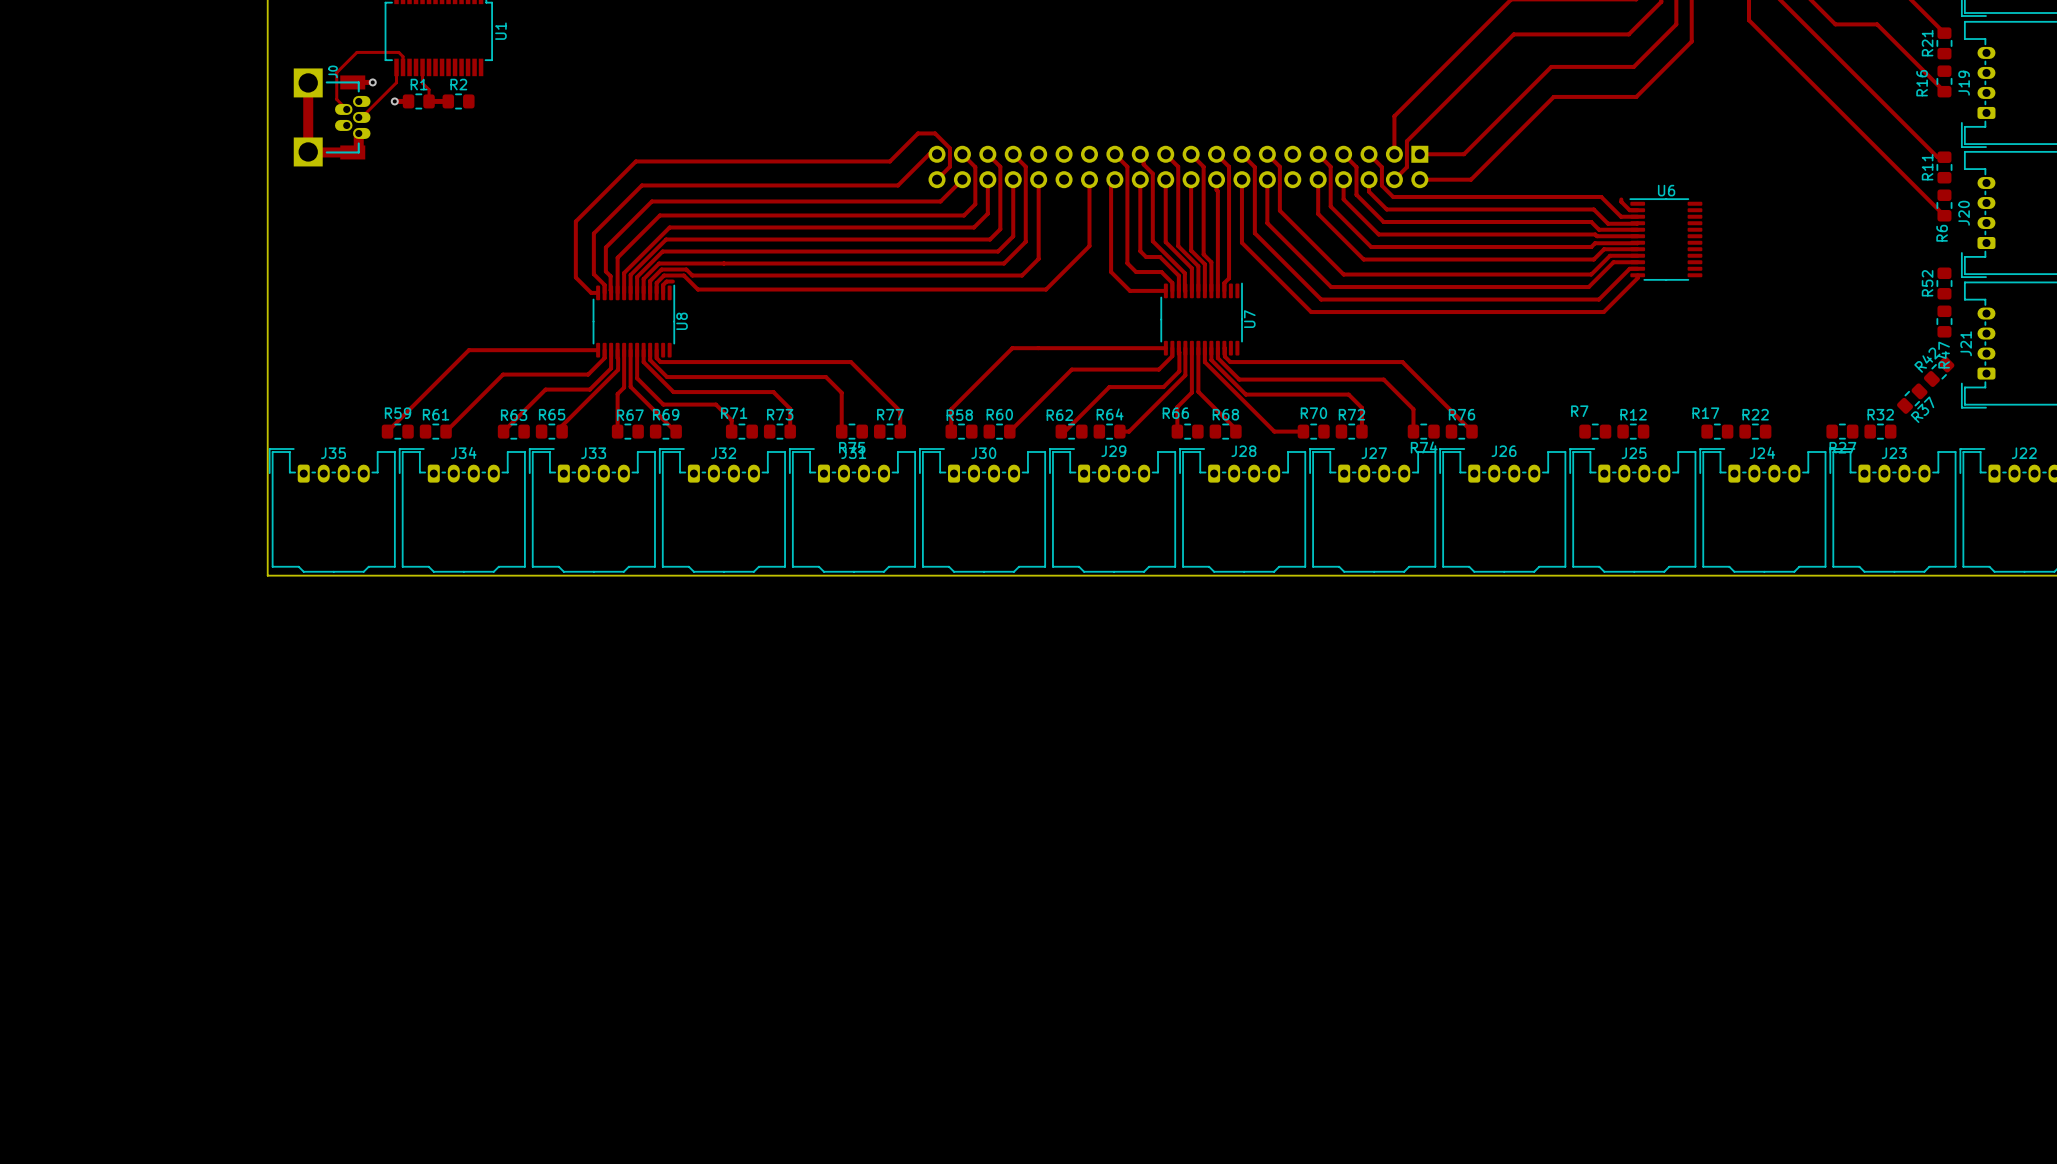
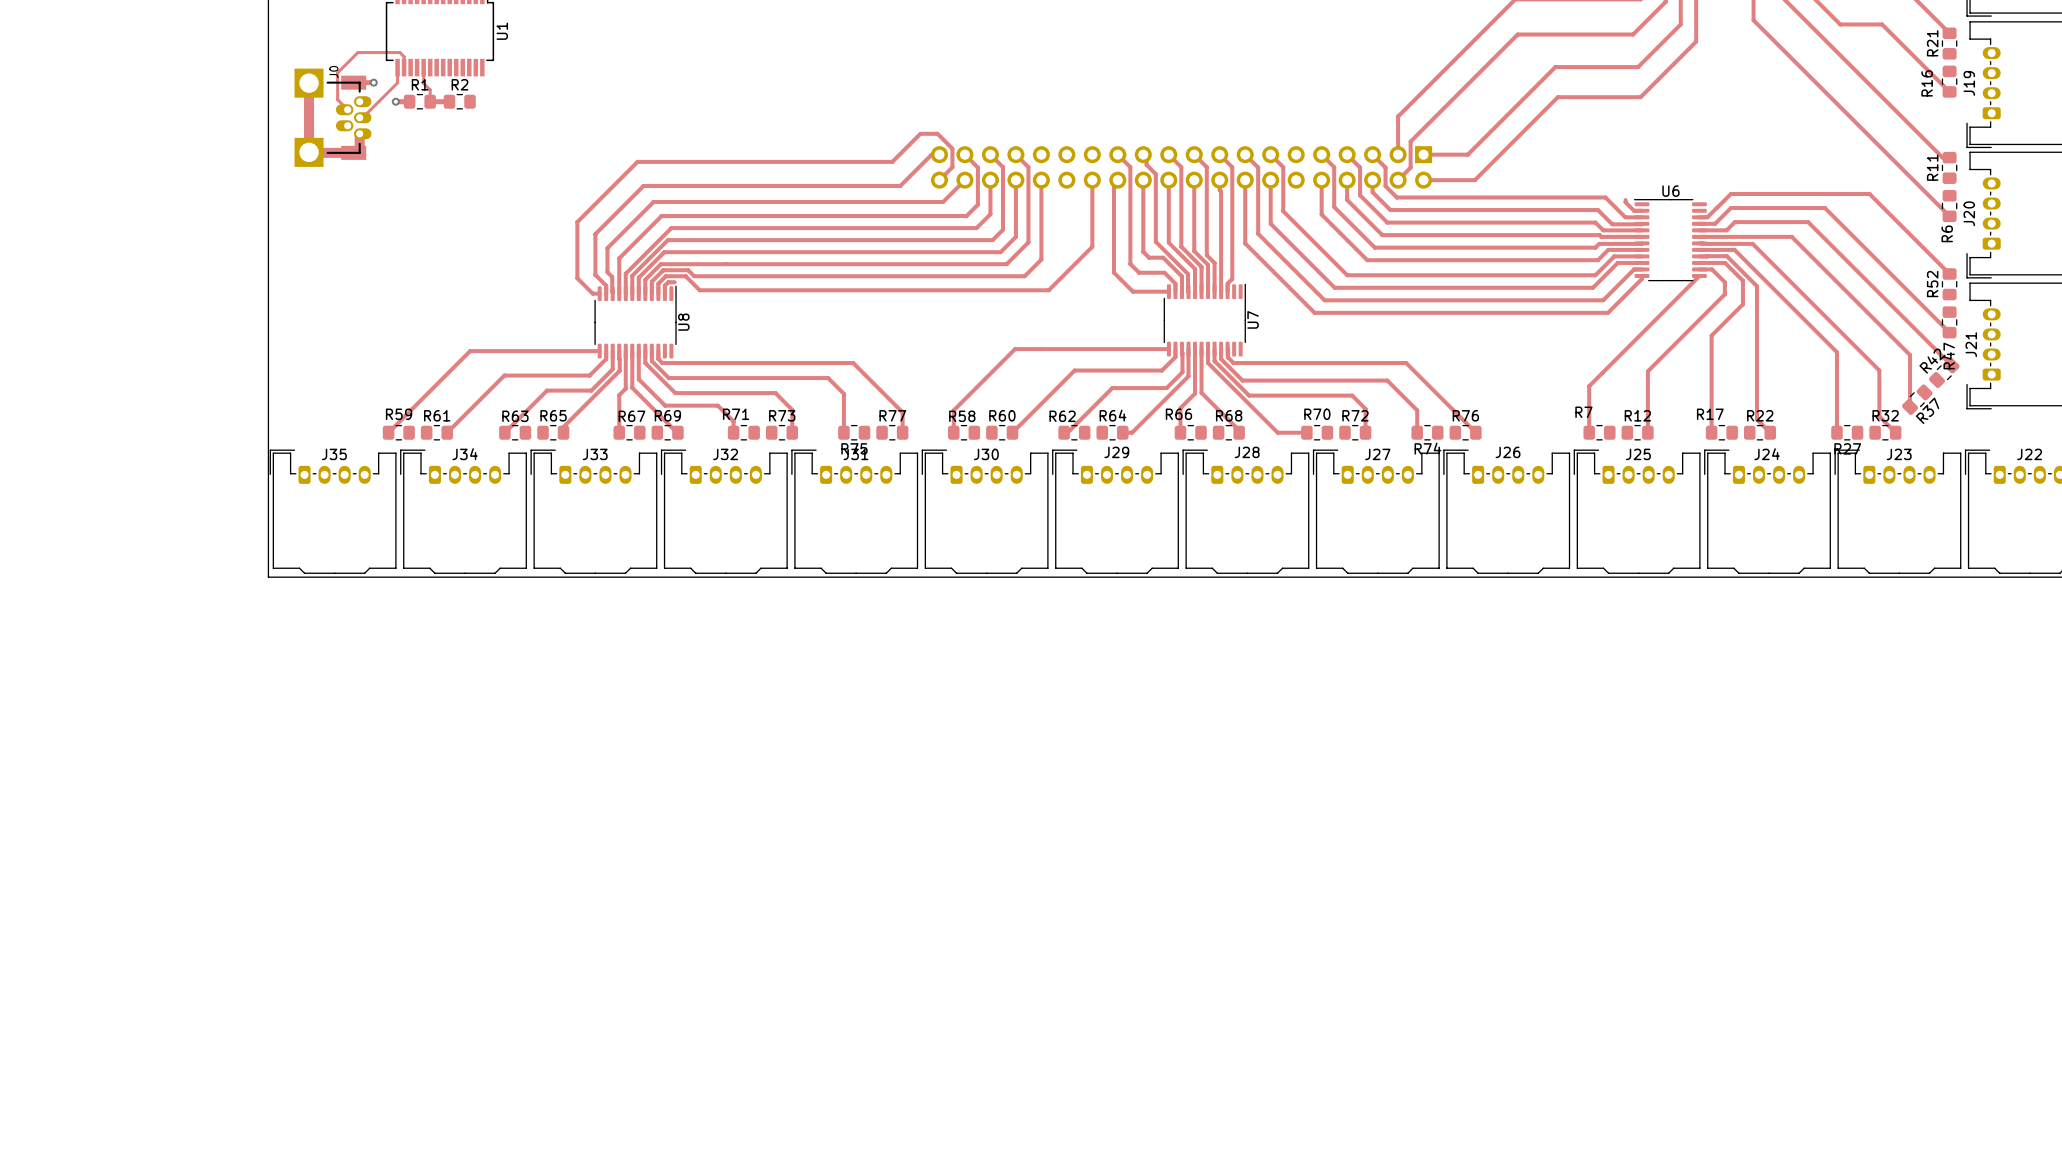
track: none -> (1716, 207) (1707, 217) (1699, 217)
track: none -> (1717, 207) (1730, 193) (1869, 193) (1949, 273)
track: none -> (1699, 223) (1715, 223) (1730, 208) (1824, 208) (1949, 332)
track: none -> (1699, 230) (1726, 230) (1734, 222) (1808, 222) (1951, 365)
track: none -> (1699, 236) (1791, 236) (1910, 355) (1910, 406)
track: none -> (1699, 243) (1752, 243) (1879, 370) (1879, 416) (1895, 432)
track: none -> (1699, 249) (1734, 249) (1836, 352) (1836, 432)
track: none -> (1699, 256) (1726, 256) (1756, 286) (1756, 419) (1770, 432)
track: none -> (1699, 262) (1725, 262) (1742, 280) (1742, 304) (1711, 335) (1711, 432)
track: none -> (1699, 269) (1712, 269) (1724, 282) (1724, 294) (1647, 371) (1647, 432)
track: none -> (1699, 275) (1589, 386) (1589, 432)

